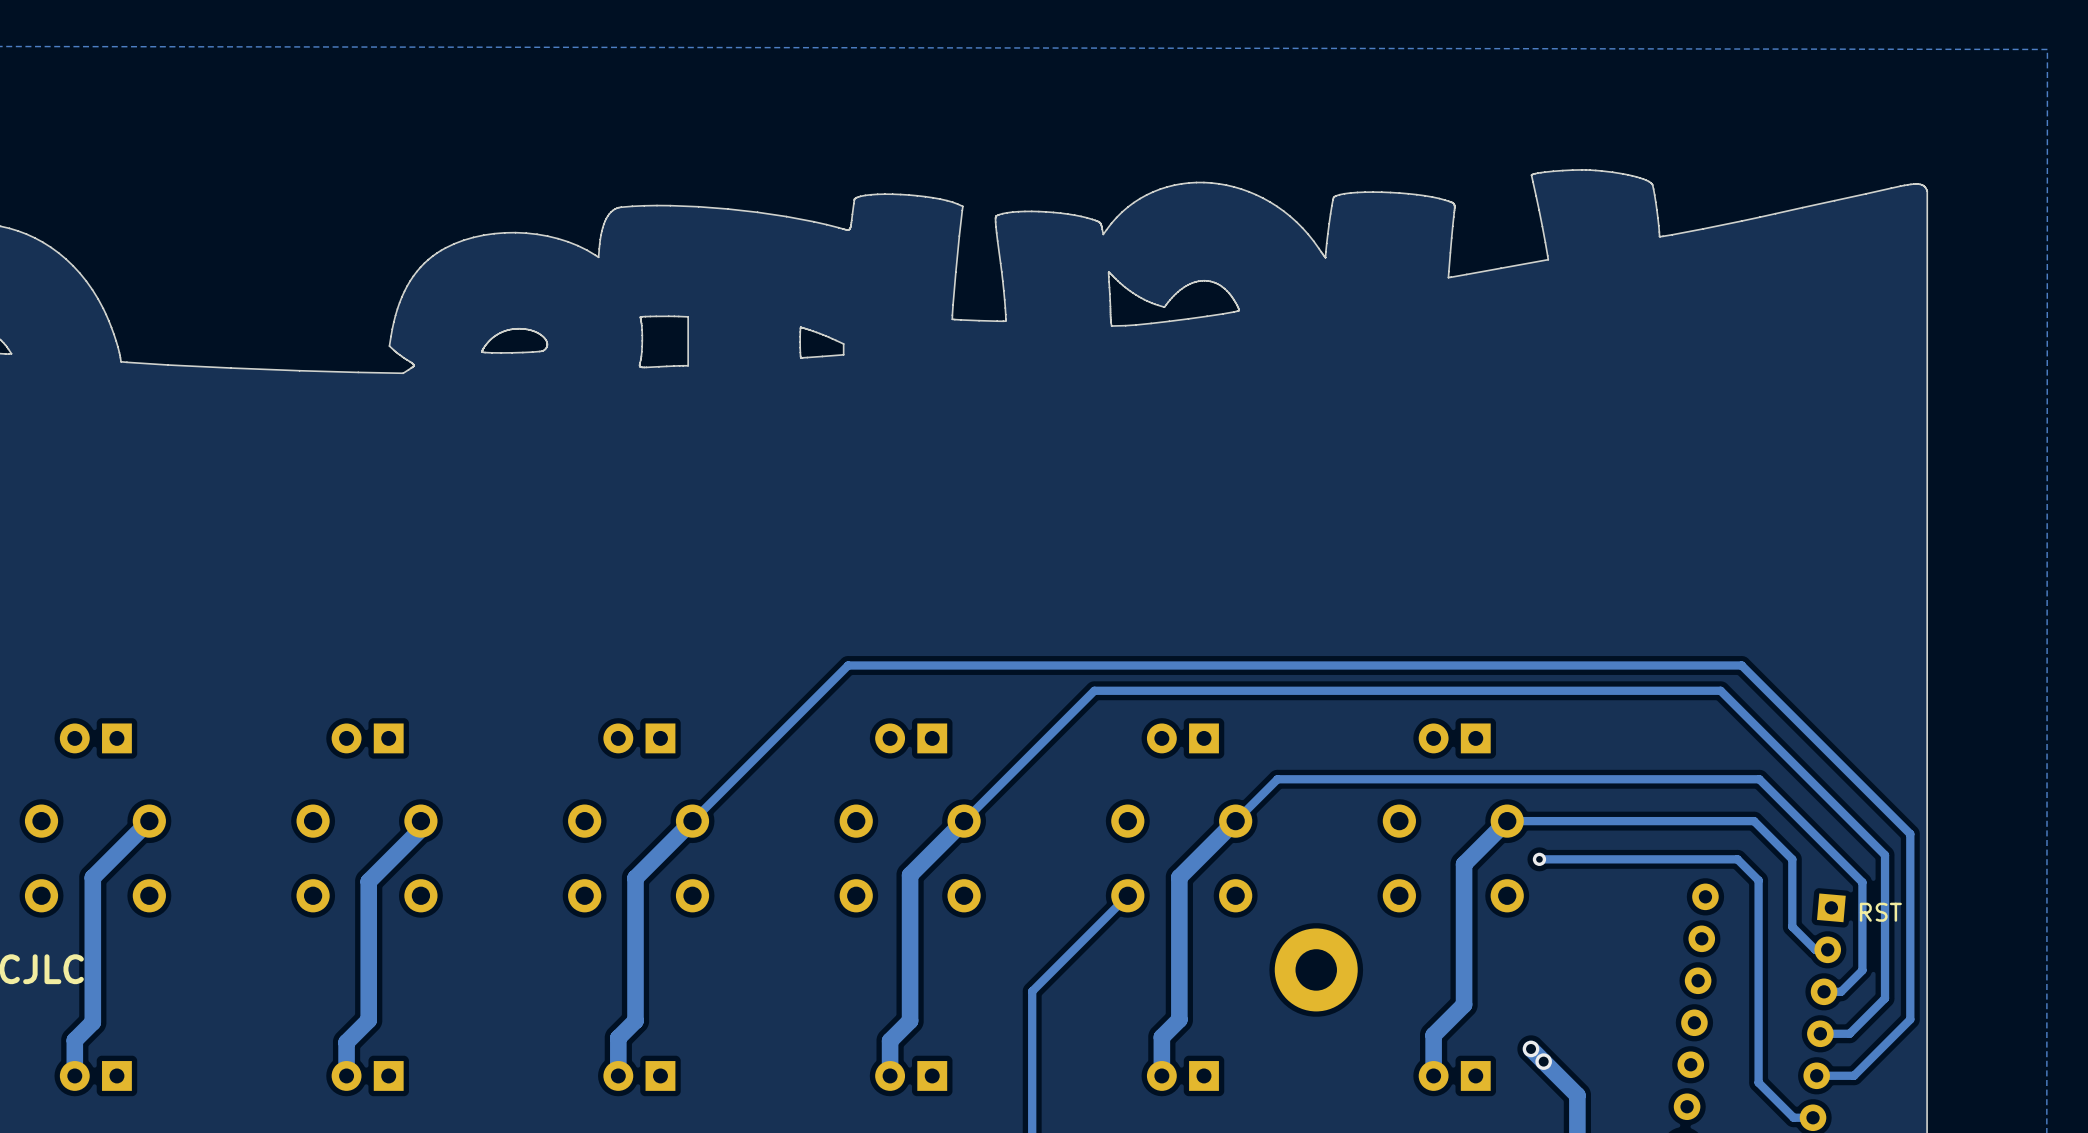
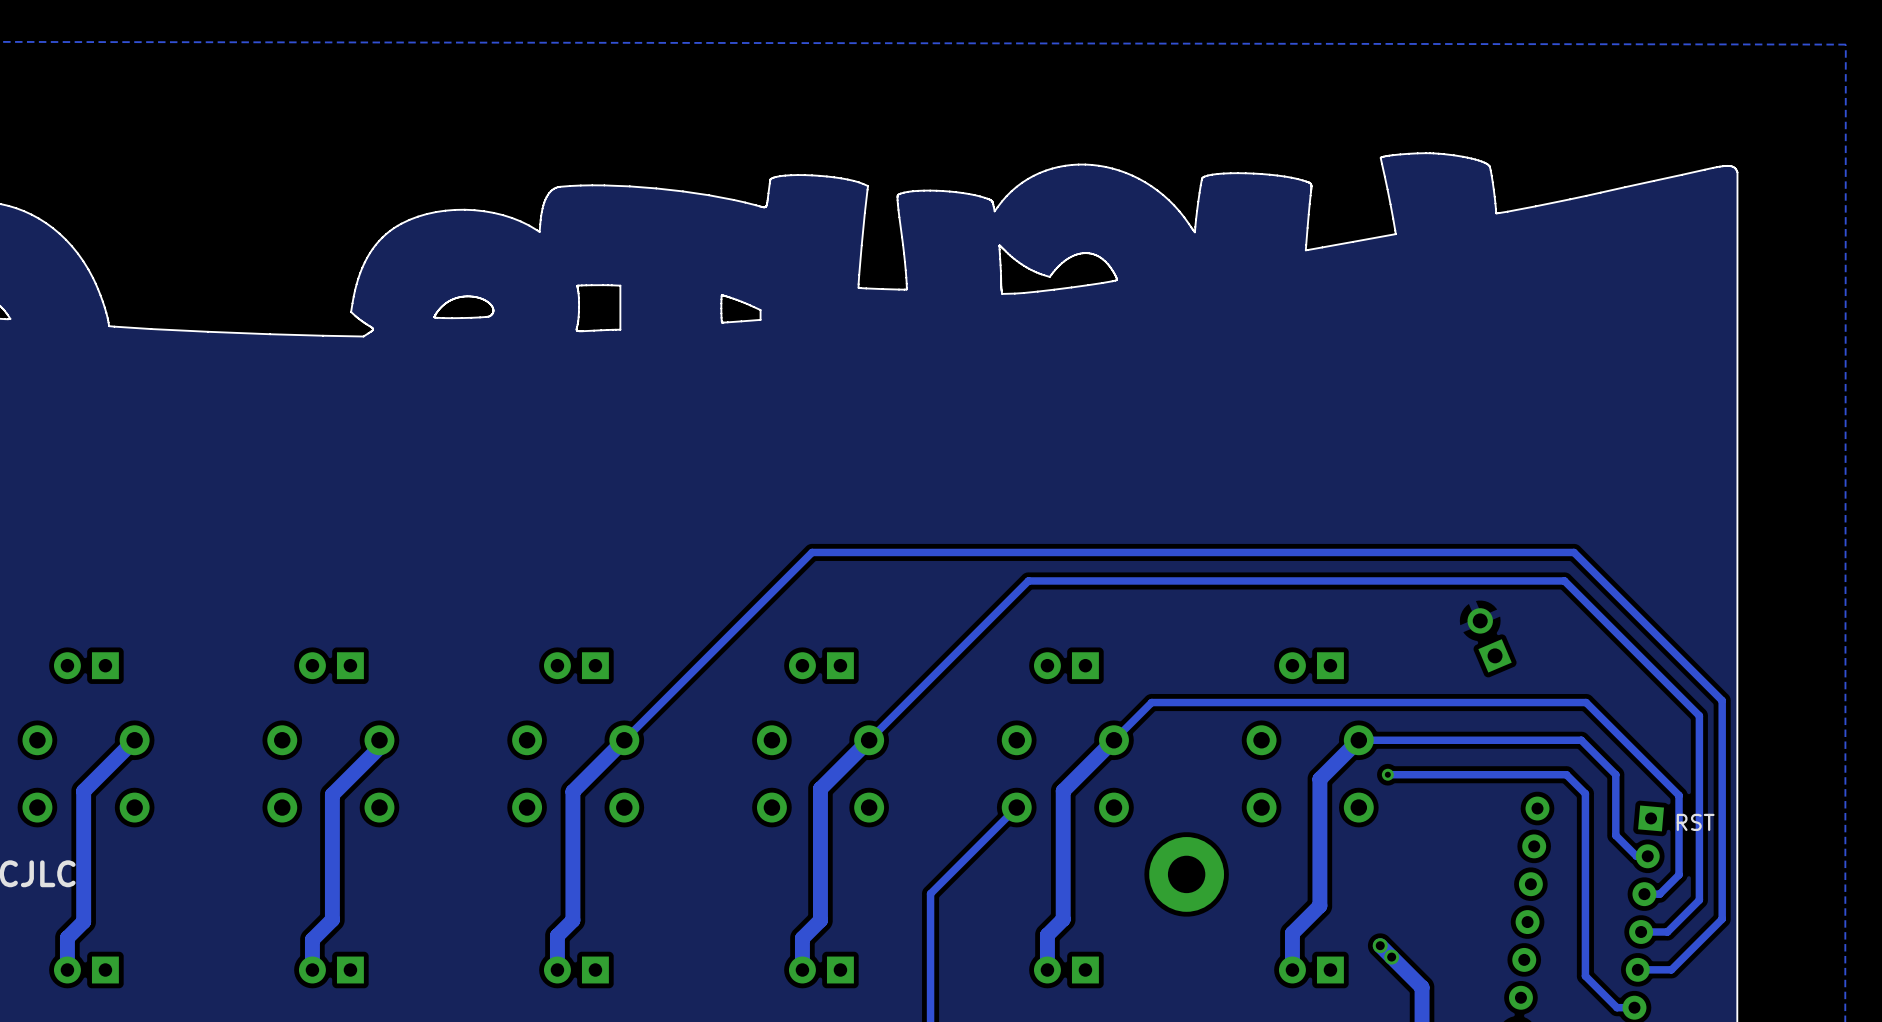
track: (848, 665) (1741, 665) (1910, 834) -> (764, 599) (812, 552) (1574, 552) (1722, 700) (1722, 751)
track: (1094, 690) (1720, 690) (1885, 855) -> (986, 622) (1028, 580) (1564, 580) (1699, 715) (1699, 770)
part: none -> (1489, 640)

